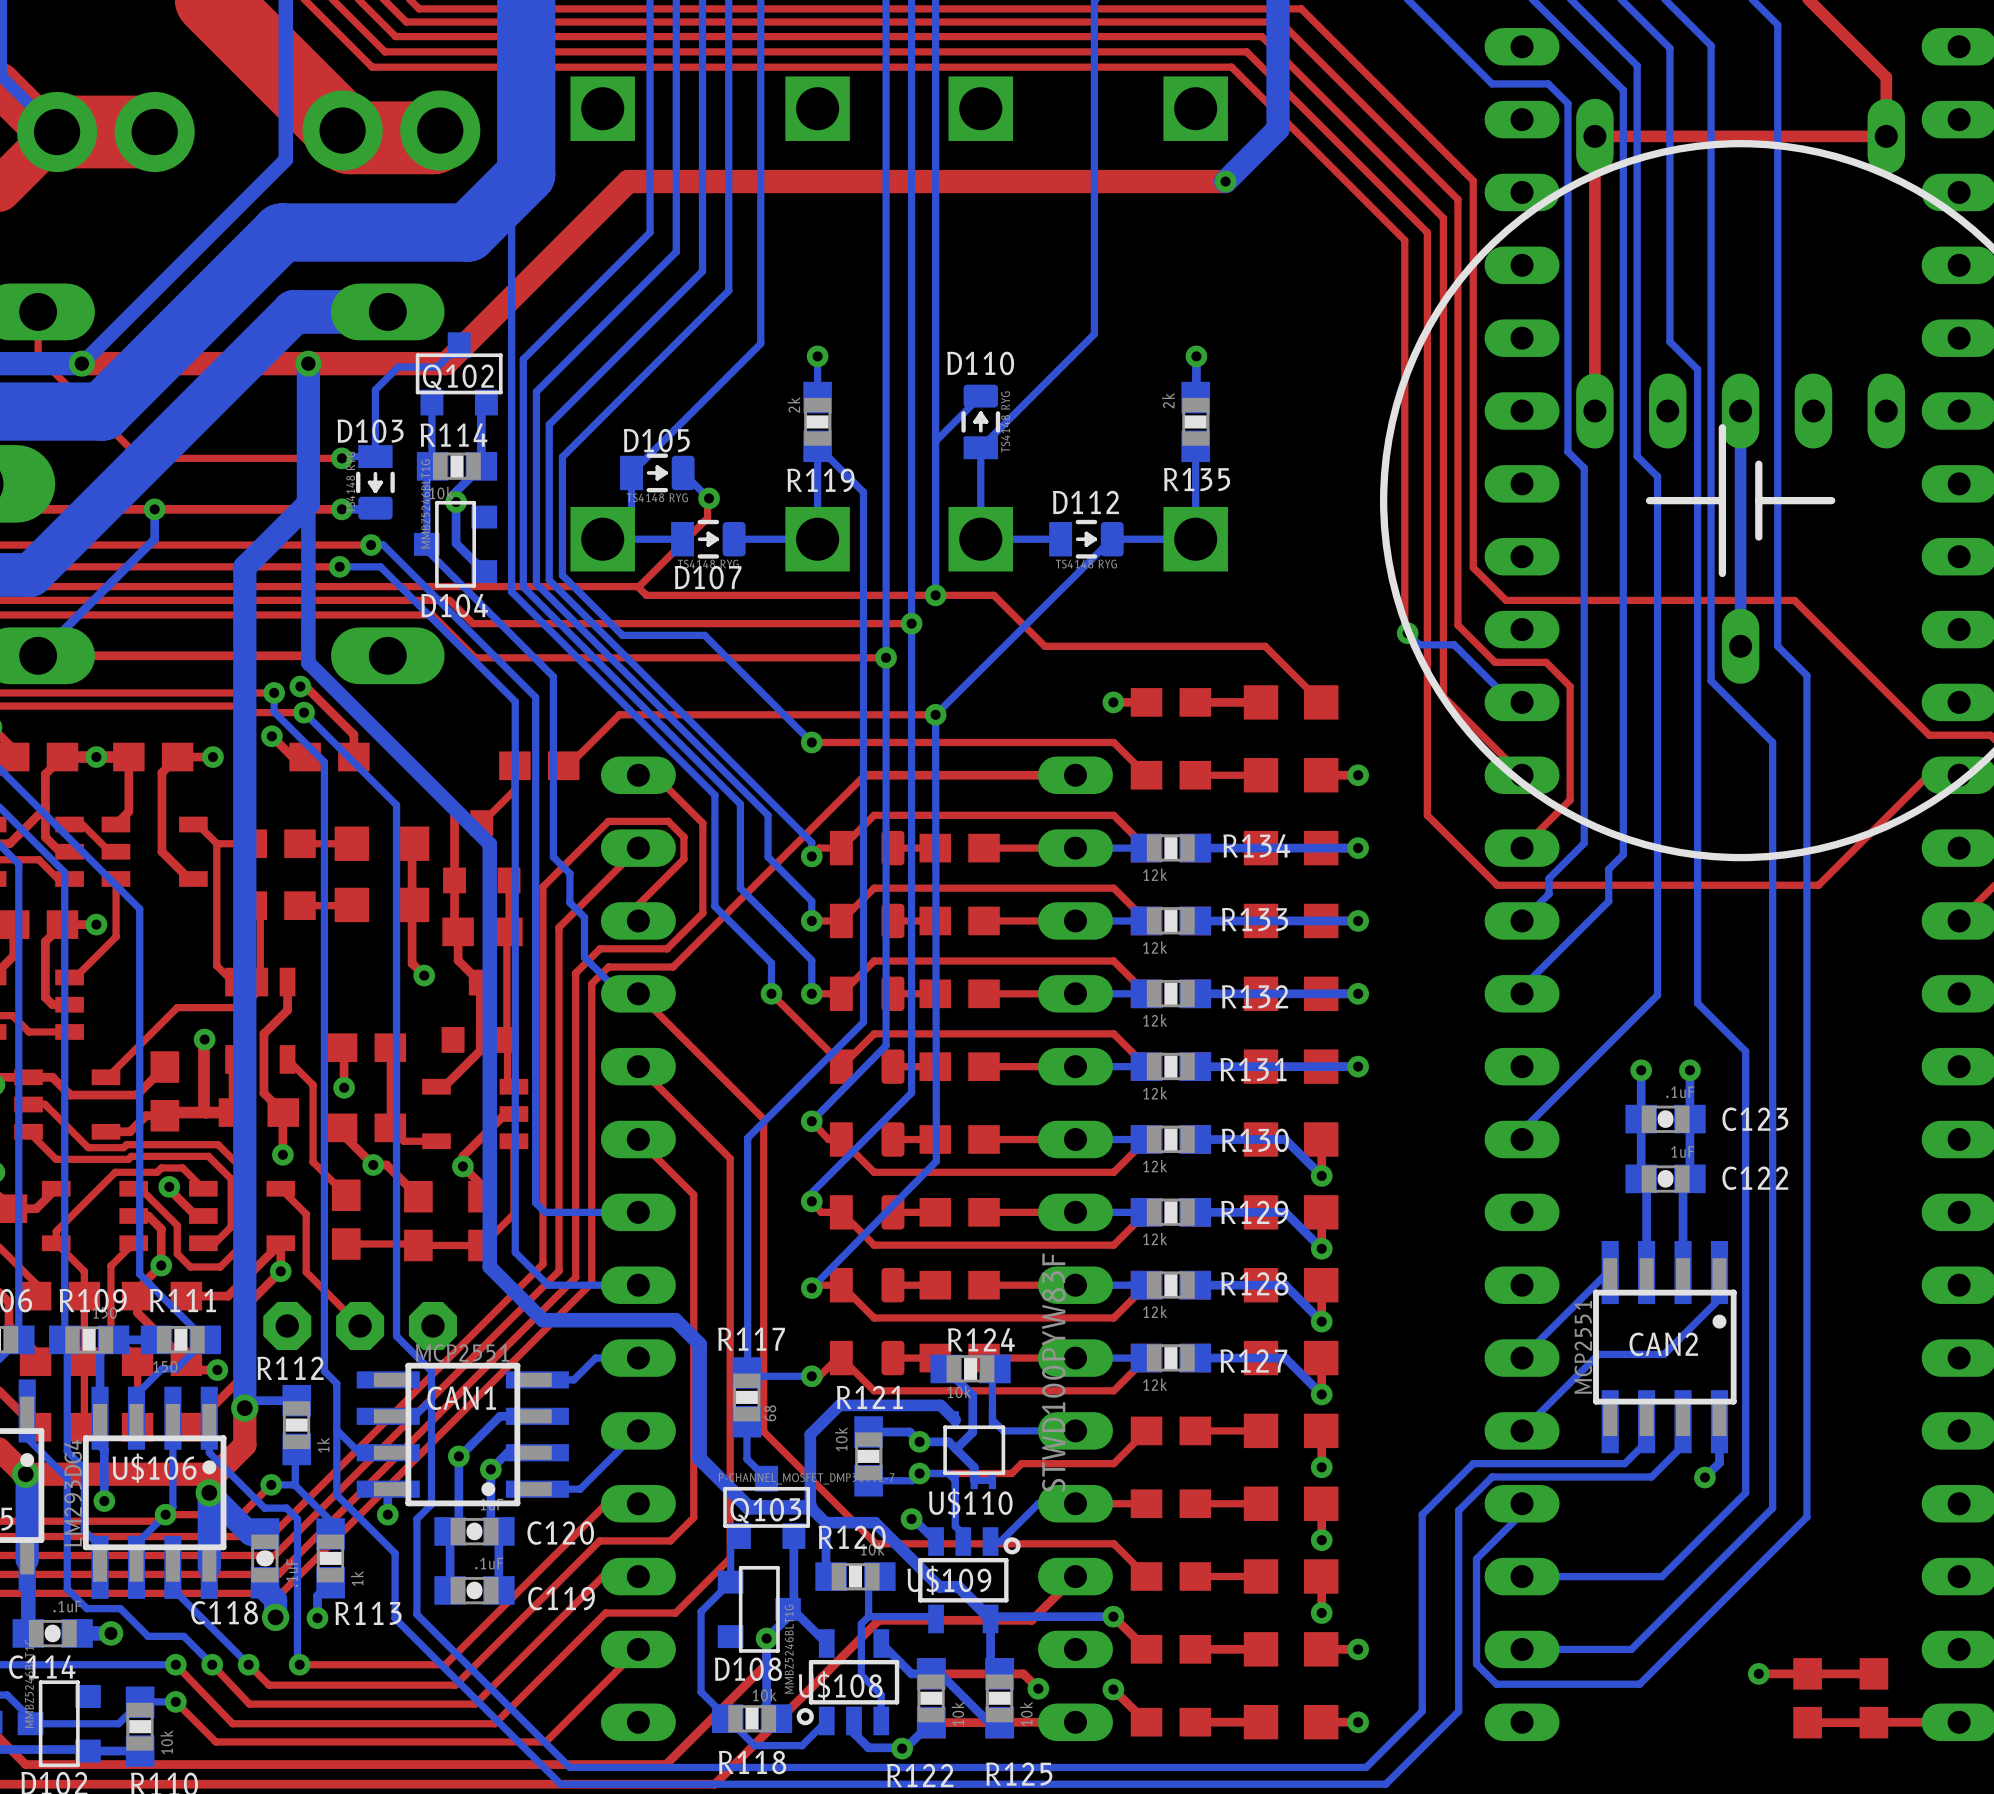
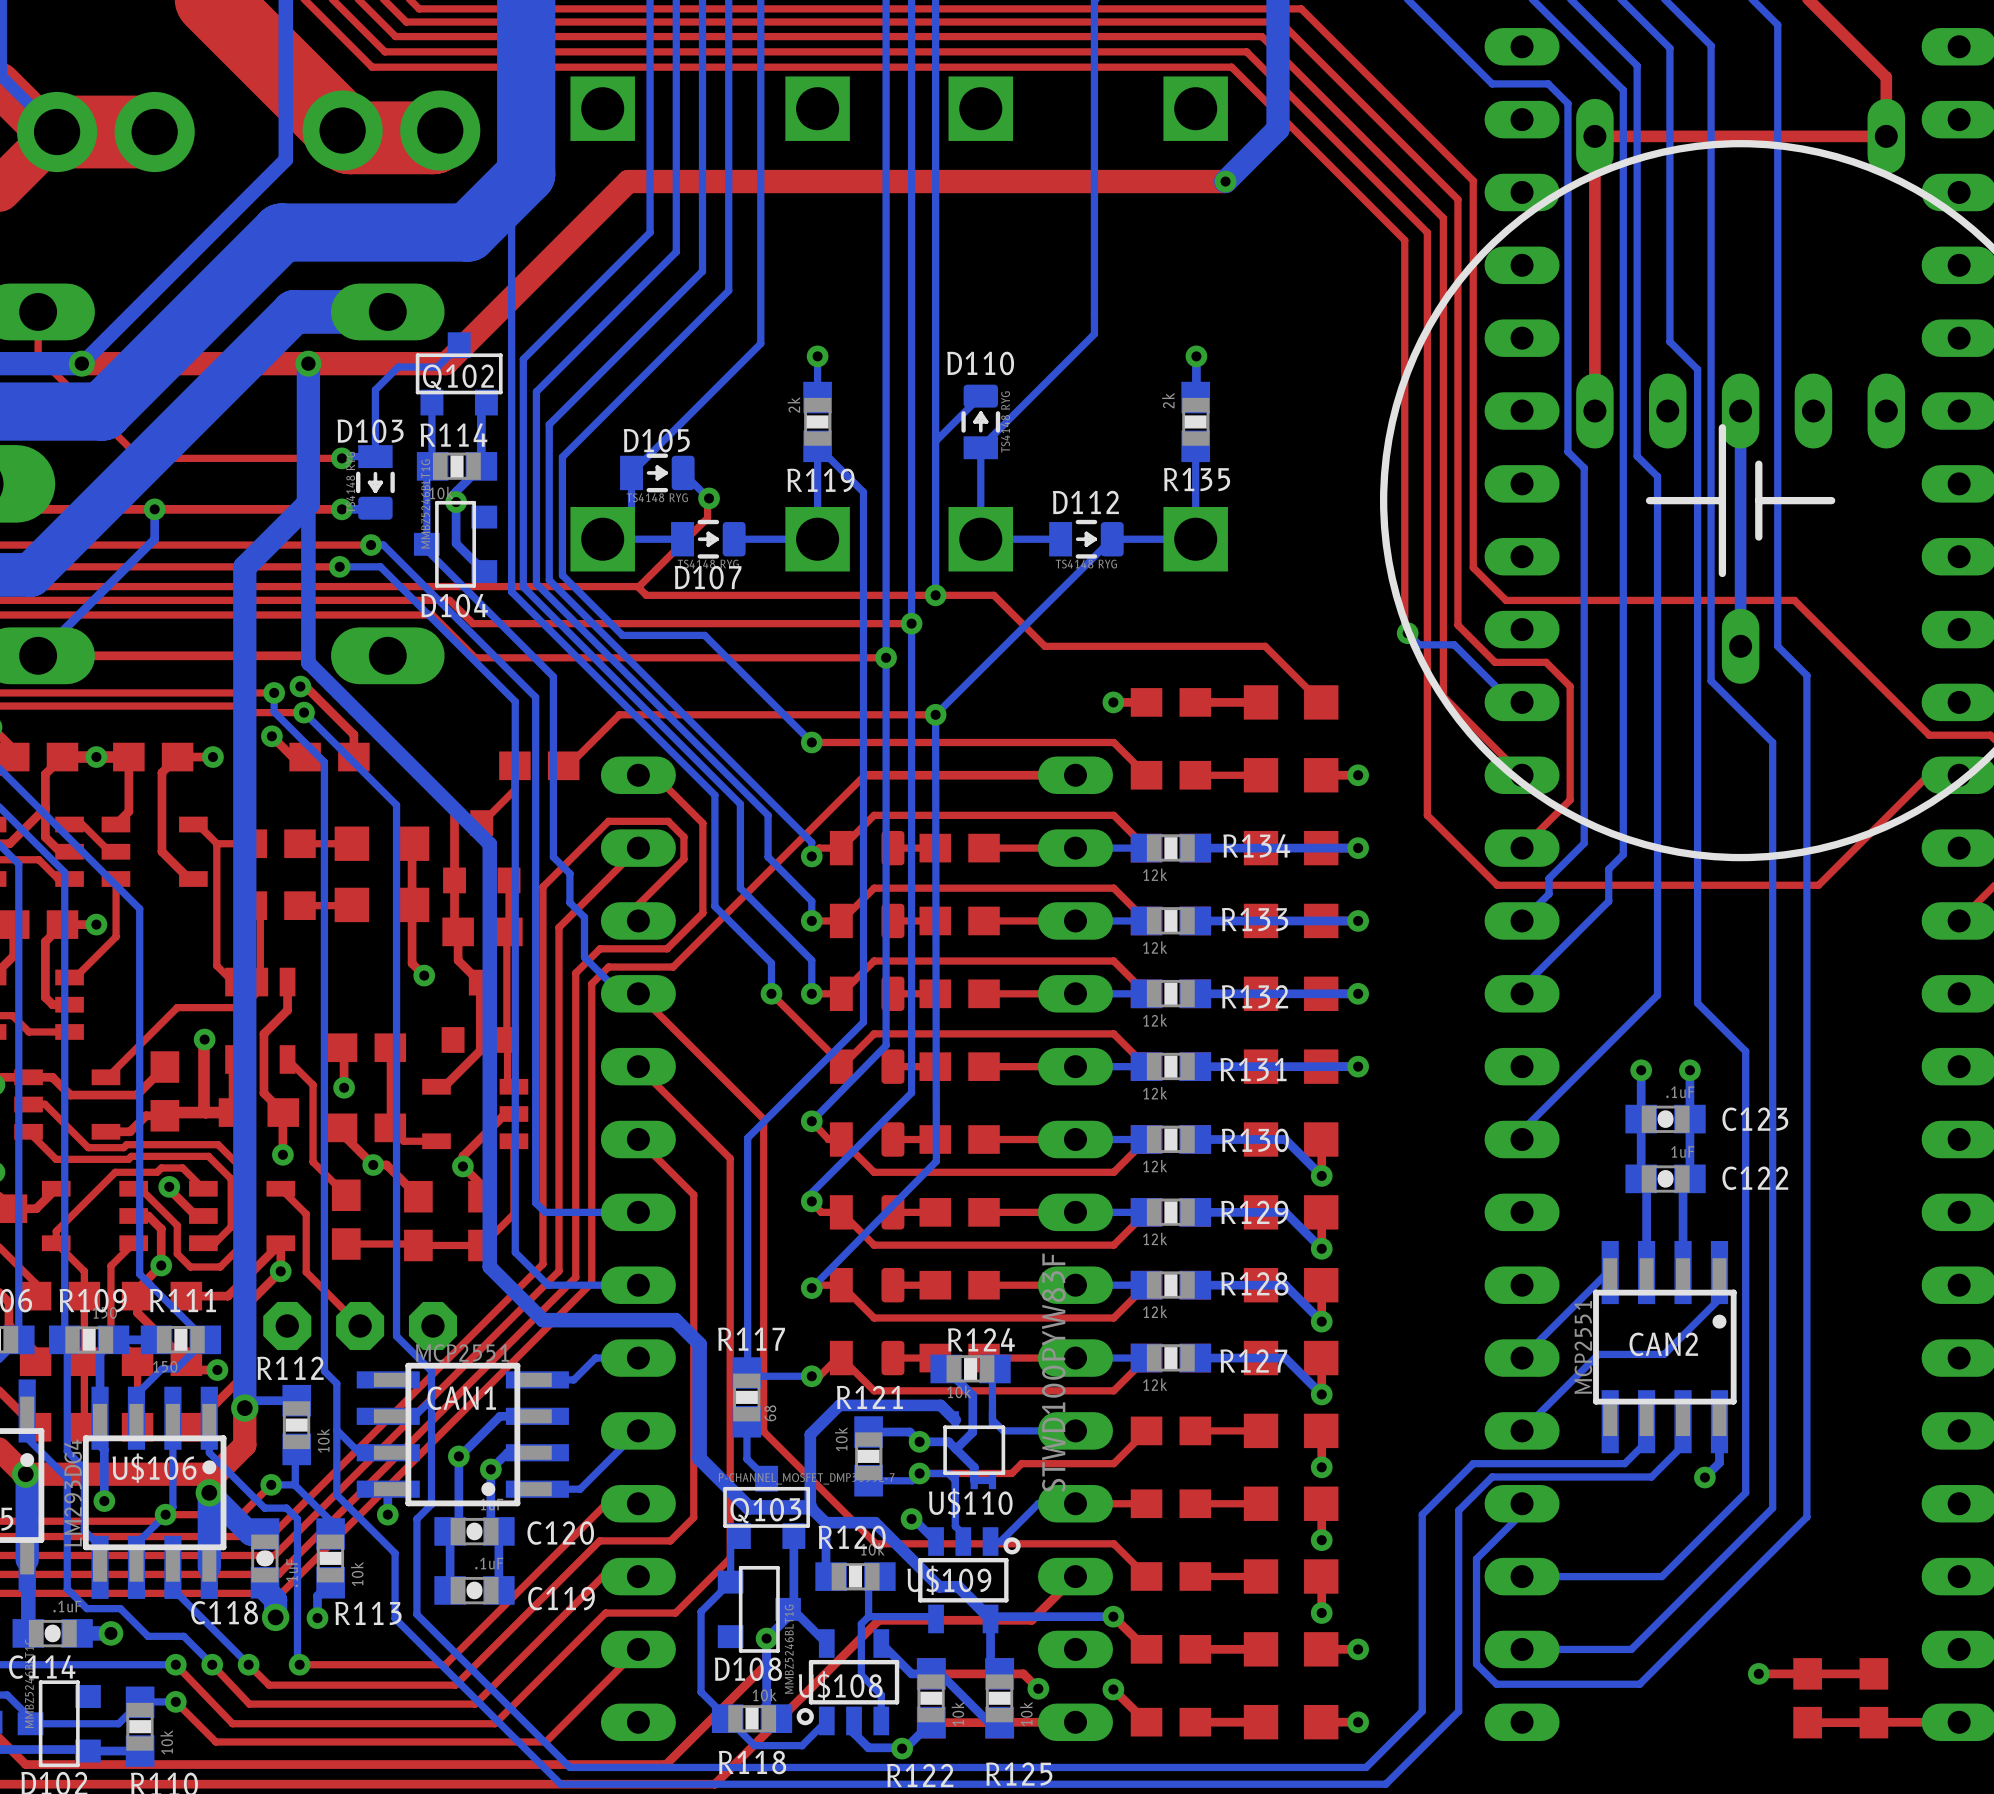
R112 value: 1k (323, 1445) -> 10k (323, 1440)
R113 value: 1k (357, 1578) -> 10k (357, 1574)

